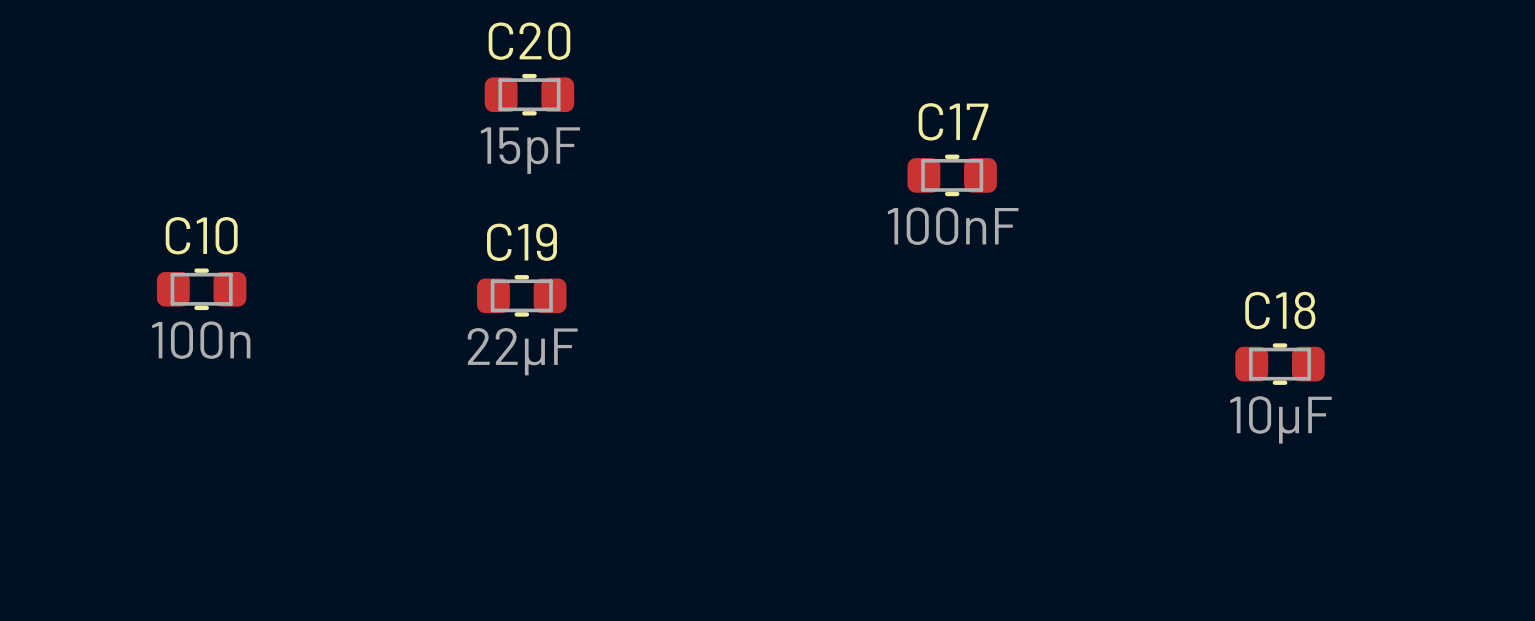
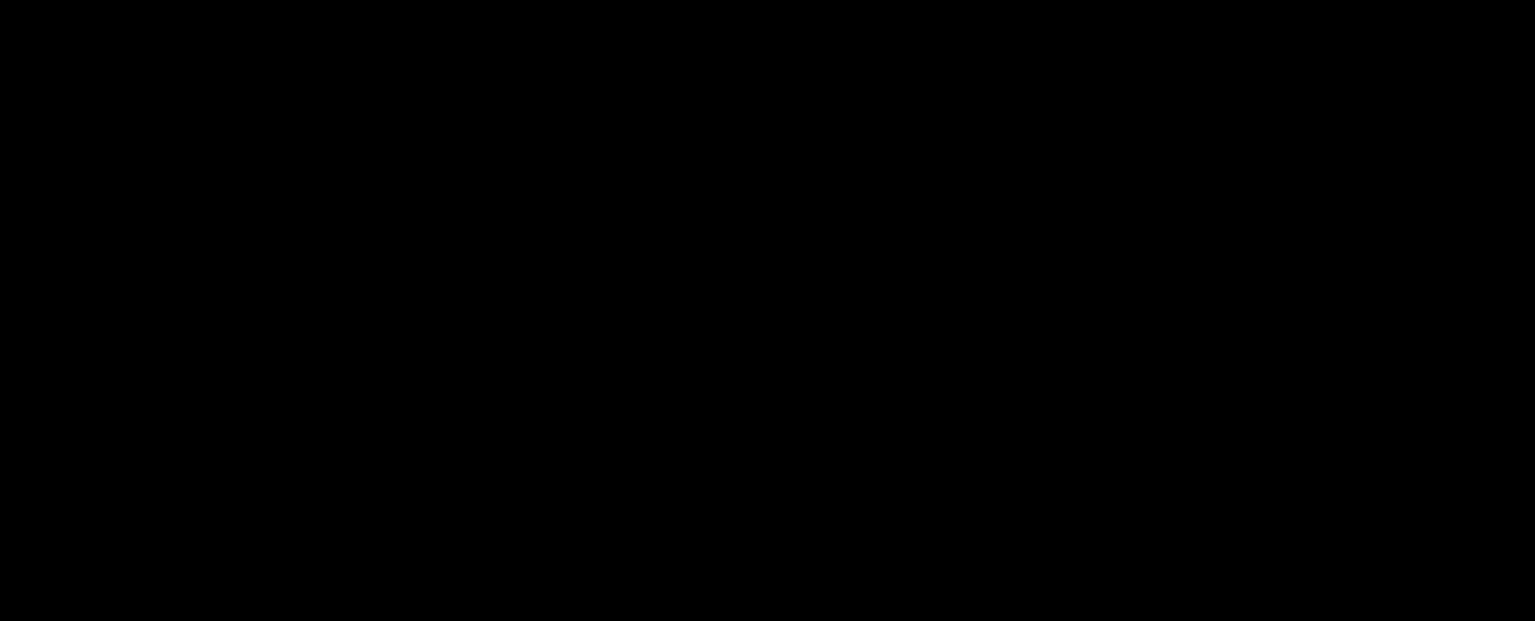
C20: 15pF (529, 94) -> none
C17: 100nF (952, 175) -> none
C10: 100n (201, 289) -> none
C19: 22µF (521, 295) -> none
C18: 10µF (1280, 364) -> none

